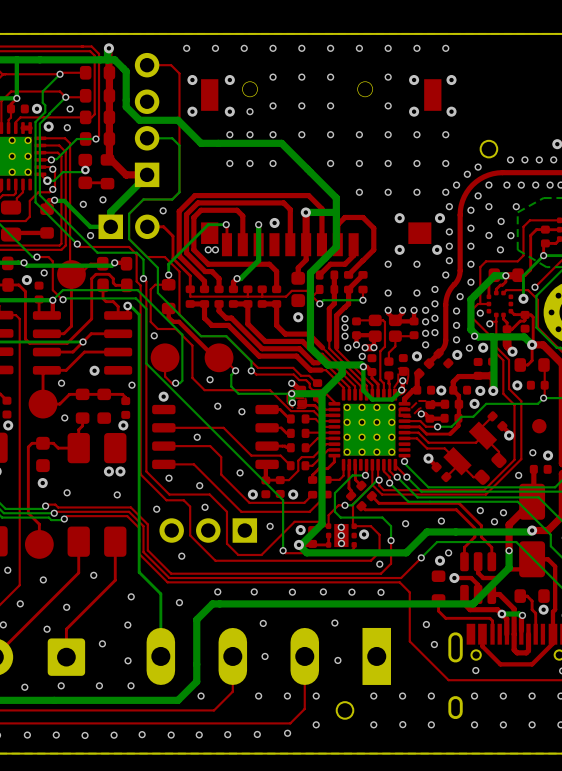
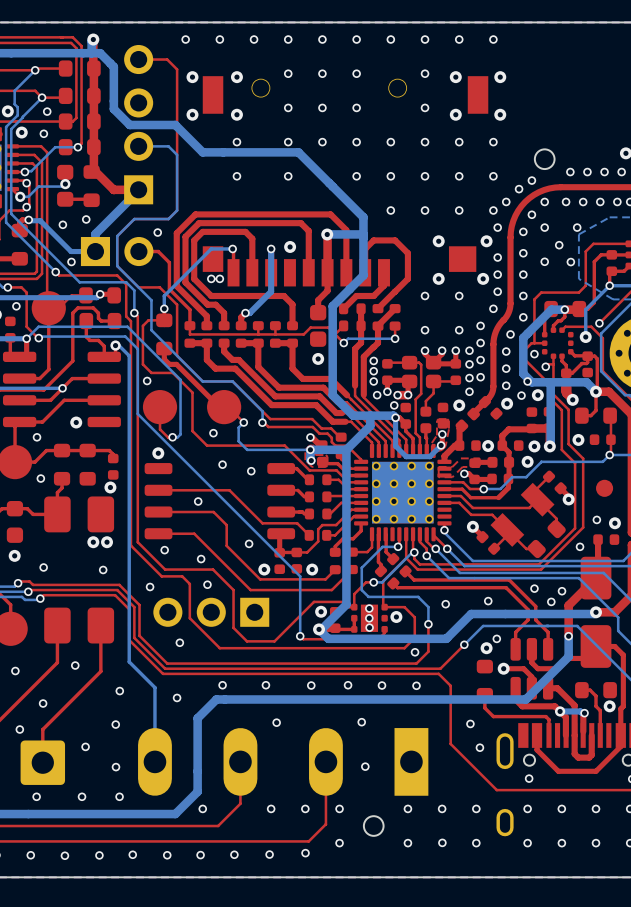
via: (250, 111) -> none
via: (250, 134) -> none
via: (250, 163) -> none
via: (500, 249) -> none
via: (131, 385) -> none
via: (270, 526) -> none
via: (265, 656) -> none

